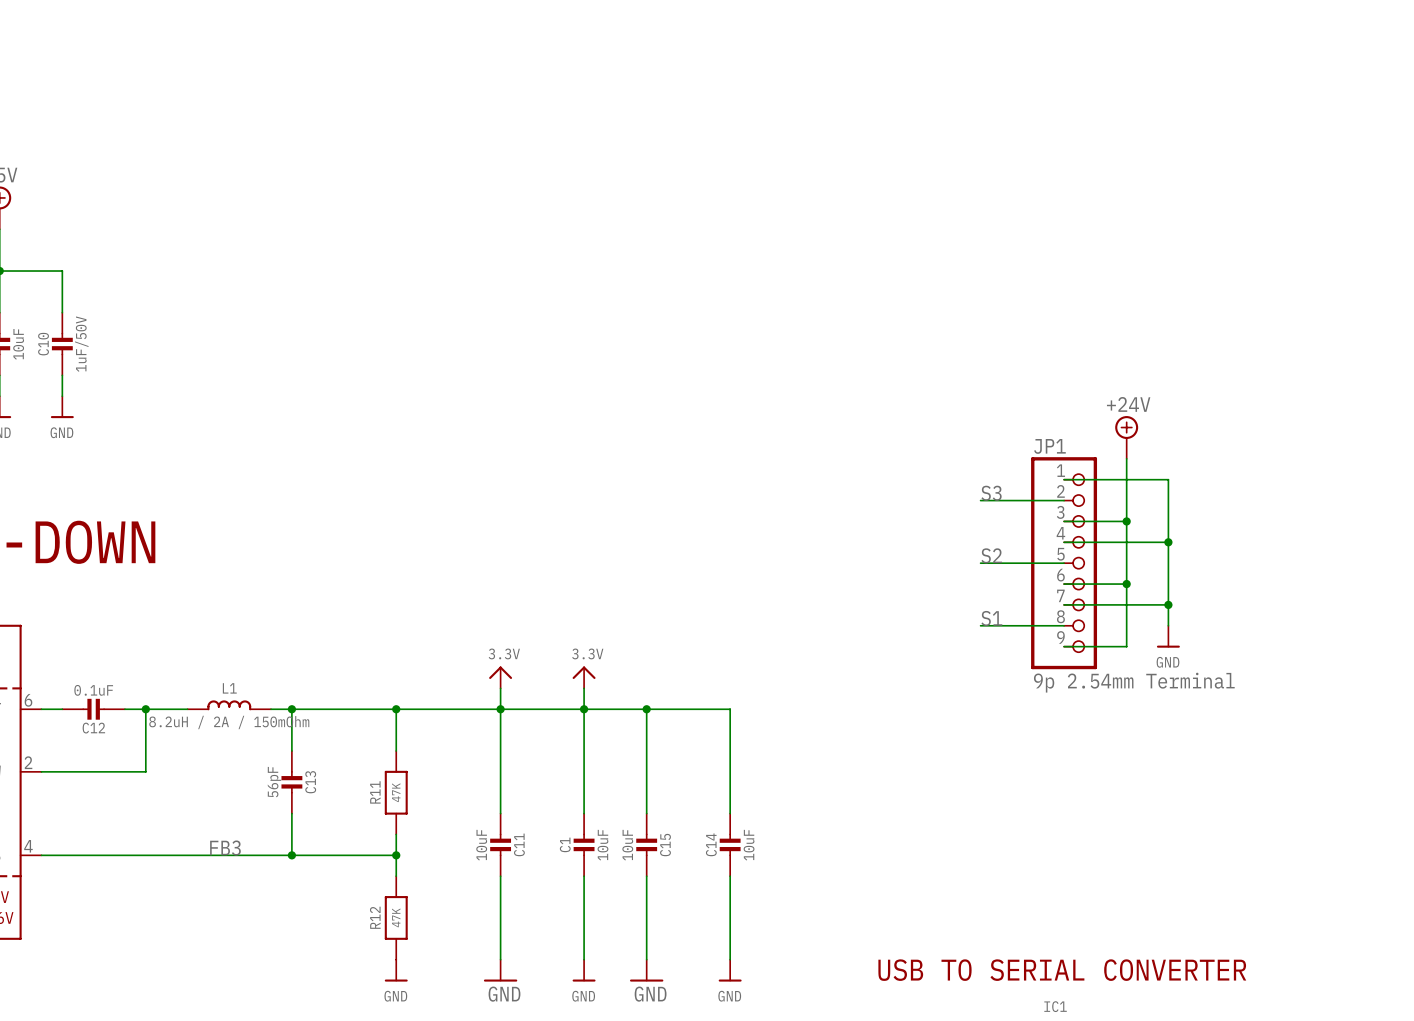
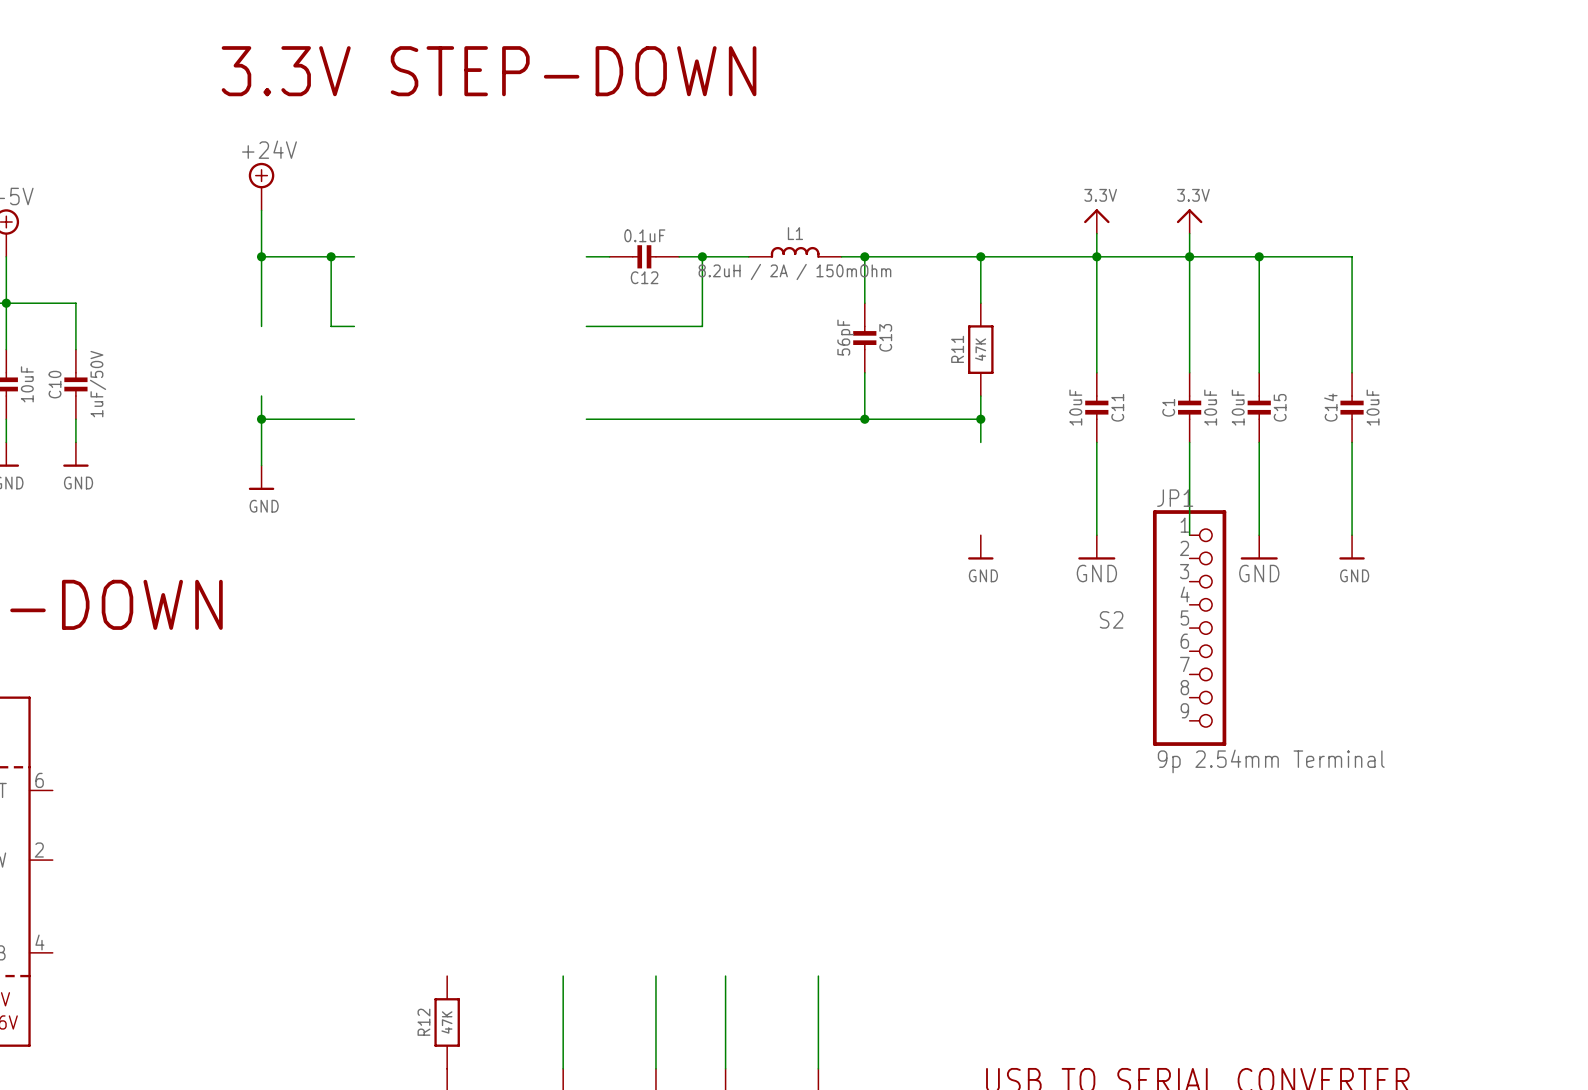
text: none -> 3.3V STEP-DOWN (489, 71)
power symbol: none -> +24V (261, 186)
wire: none -> (261, 210) (261, 326)
power symbol: none -> 3.3V (1096, 221)
power symbol: none -> 3.3V (1189, 221)
wire: none -> (1096, 233) (1096, 372)
wire: none -> (1189, 233) (1189, 372)
wire: none -> (261, 256) (354, 256)
junction: none -> (261, 256)
wire: none -> (331, 256) (331, 326) (354, 326)
junction: none -> (331, 256)
wire: none -> (586, 256) (609, 256)
wire: none -> (679, 256) (748, 256)
wire: none -> (702, 256) (702, 326) (586, 326)
junction: none -> (702, 256)
wire: none -> (841, 256) (1352, 256) (1352, 372)
wire: none -> (864, 256) (864, 303)
junction: none -> (864, 256)
wire: none -> (980, 256) (980, 303)
junction: none -> (980, 256)
junction: none -> (1096, 256)
junction: none -> (1189, 256)
wire: none -> (1259, 256) (1259, 372)
junction: none -> (1259, 256)
wire: none -> (864, 372) (864, 419)
wire: none -> (261, 396) (261, 465)
wire: none -> (980, 396) (980, 442)
wire: none -> (261, 419) (354, 419)
junction: none -> (261, 419)
wire: none -> (586, 419) (980, 419)
junction: none -> (864, 419)
junction: none -> (980, 419)
wire: none -> (1096, 442) (1096, 535)
wire: none -> (1352, 442) (1352, 535)
power symbol: none -> GND (261, 477)
power symbol: +24V (1126, 437) -> none
wire: (1064, 479) (1168, 479) (1168, 625) -> (1189, 535) (1189, 442)
wire: (1126, 479) (1126, 646) (1064, 646) -> none
power symbol: none -> GND (980, 547)
power symbol: none -> GND (1096, 547)
power symbol: none -> GND (1259, 547)
label: S3 (991, 493) -> none
wire: (980, 500) (1064, 500) -> none
wire: (1064, 521) (1126, 521) -> none
junction: (1126, 521) -> none
wire: (1064, 542) (1168, 542) -> none
junction: (1168, 542) -> none
wire: (980, 563) (1064, 563) -> none
wire: (1064, 584) (1126, 584) -> none
junction: (1126, 584) -> none
wire: (1064, 604) (1168, 604) -> none
junction: (1168, 604) -> none
label: S1 (991, 618) -> none
wire: (980, 625) (1064, 625) -> none
power symbol position: GND (1168, 636) -> GND (1352, 547)
power symbol: 3.3V (500, 677) -> none
power symbol: 3.3V (584, 677) -> none
wire: (500, 688) (500, 813) -> none
wire: (584, 688) (584, 813) -> none
L1 position: (229, 705) -> (795, 252)
wire: (41, 709) (62, 709) -> none
C12 position: (93, 709) -> (644, 256)
wire: (124, 709) (187, 709) -> none
wire: (145, 709) (145, 771) (41, 771) -> none
junction: (145, 709) -> none
wire: (271, 709) (730, 709) (730, 813) -> none
wire: (291, 709) (291, 751) -> none
junction: (291, 709) -> none
wire: (396, 709) (396, 751) -> none
junction: (396, 709) -> none
junction: (500, 709) -> none
junction: (584, 709) -> none
wire: (646, 709) (646, 813) -> none
junction: (646, 709) -> none
C13 position: (291, 782) -> (864, 338)
R11 position: (396, 792) -> (980, 349)
wire: (291, 813) (291, 855) -> none
wire: (396, 834) (396, 876) -> none
C11 position: (500, 844) -> (1096, 407)
C1 position: (584, 844) -> (1189, 407)
C15 position: (646, 844) -> (1259, 407)
C14 position: (730, 844) -> (1352, 407)
label: FB3 (225, 848) -> none
wire: (41, 855) (396, 855) -> none
junction: (291, 855) -> none
junction: (396, 855) -> none

